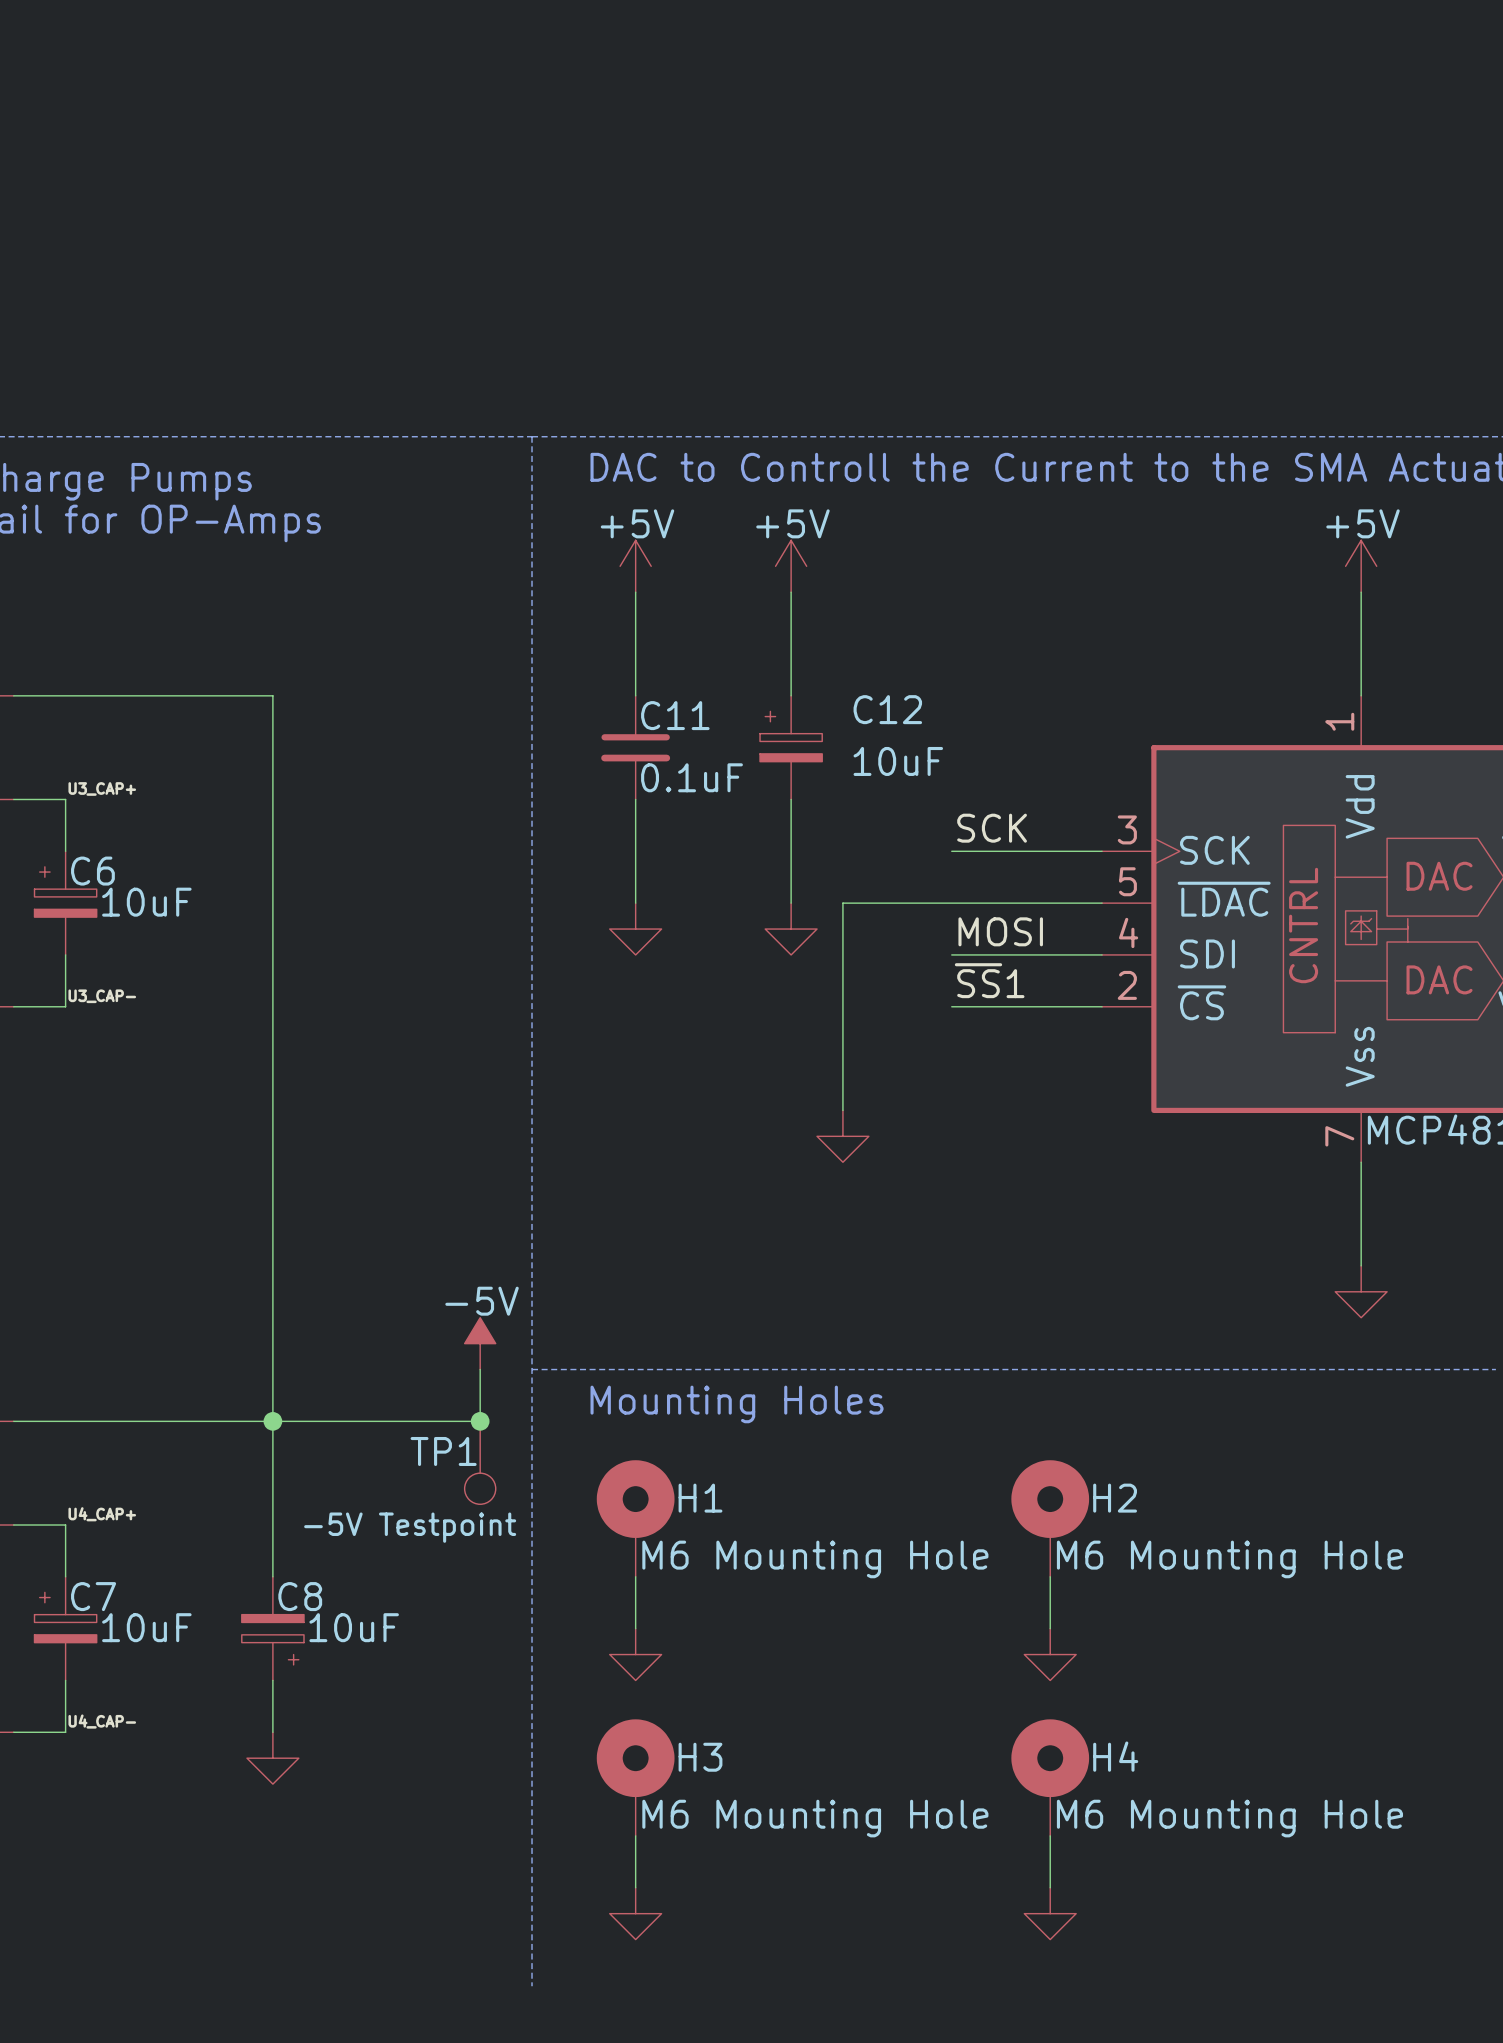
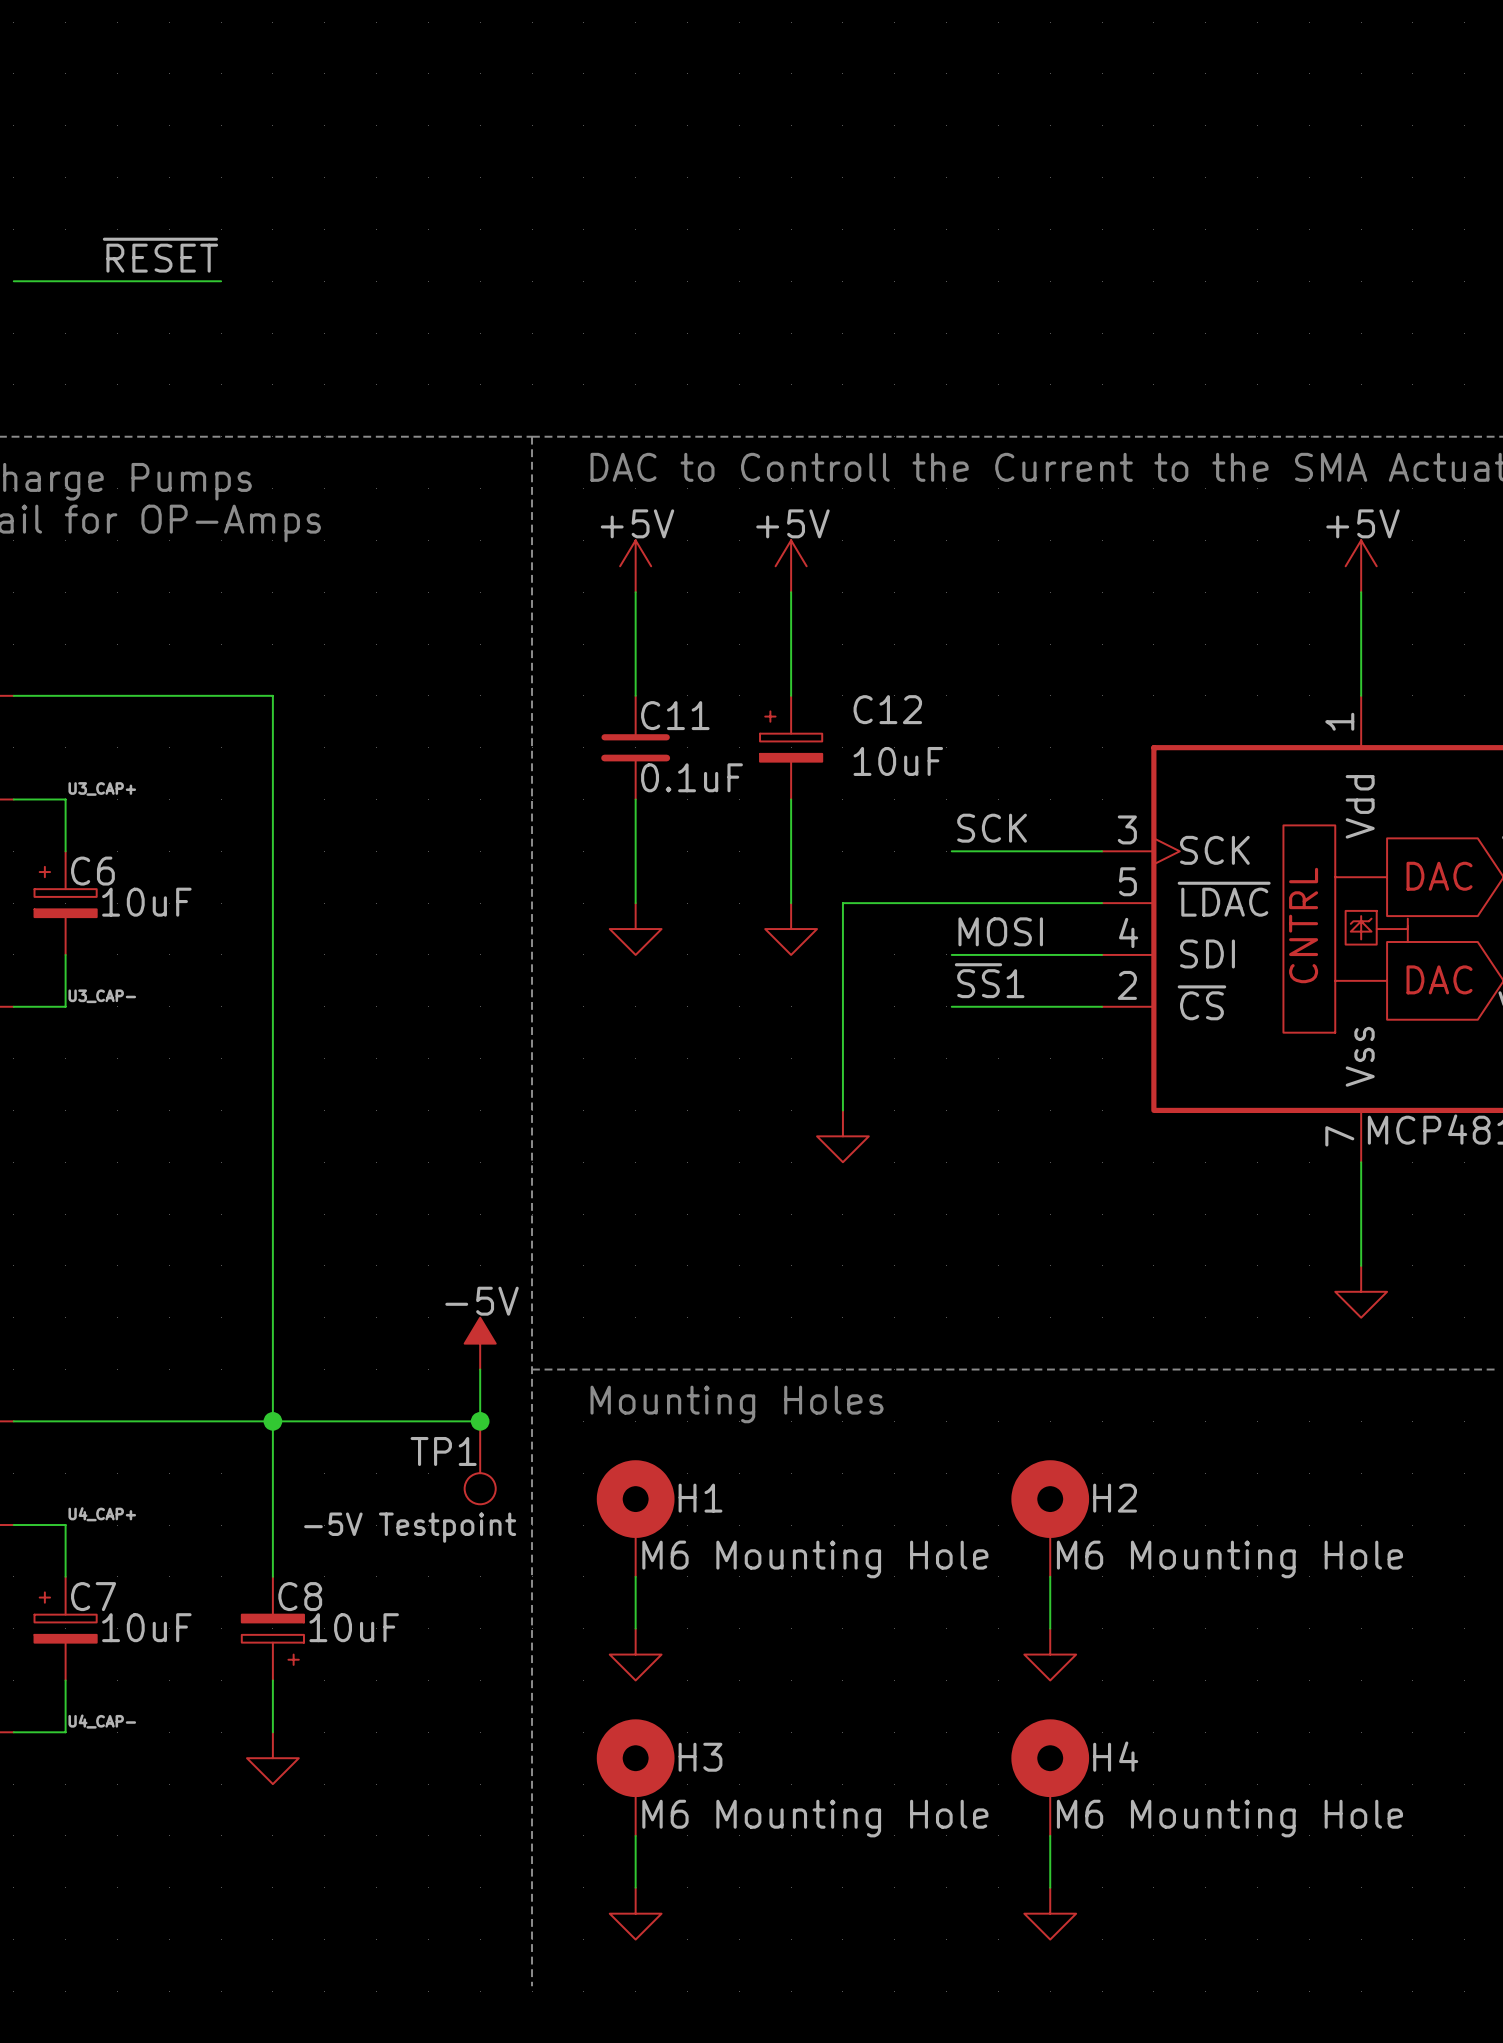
label: none -> ~{RESET} (160, 255)
wire: none -> (13, 281) (221, 281)

